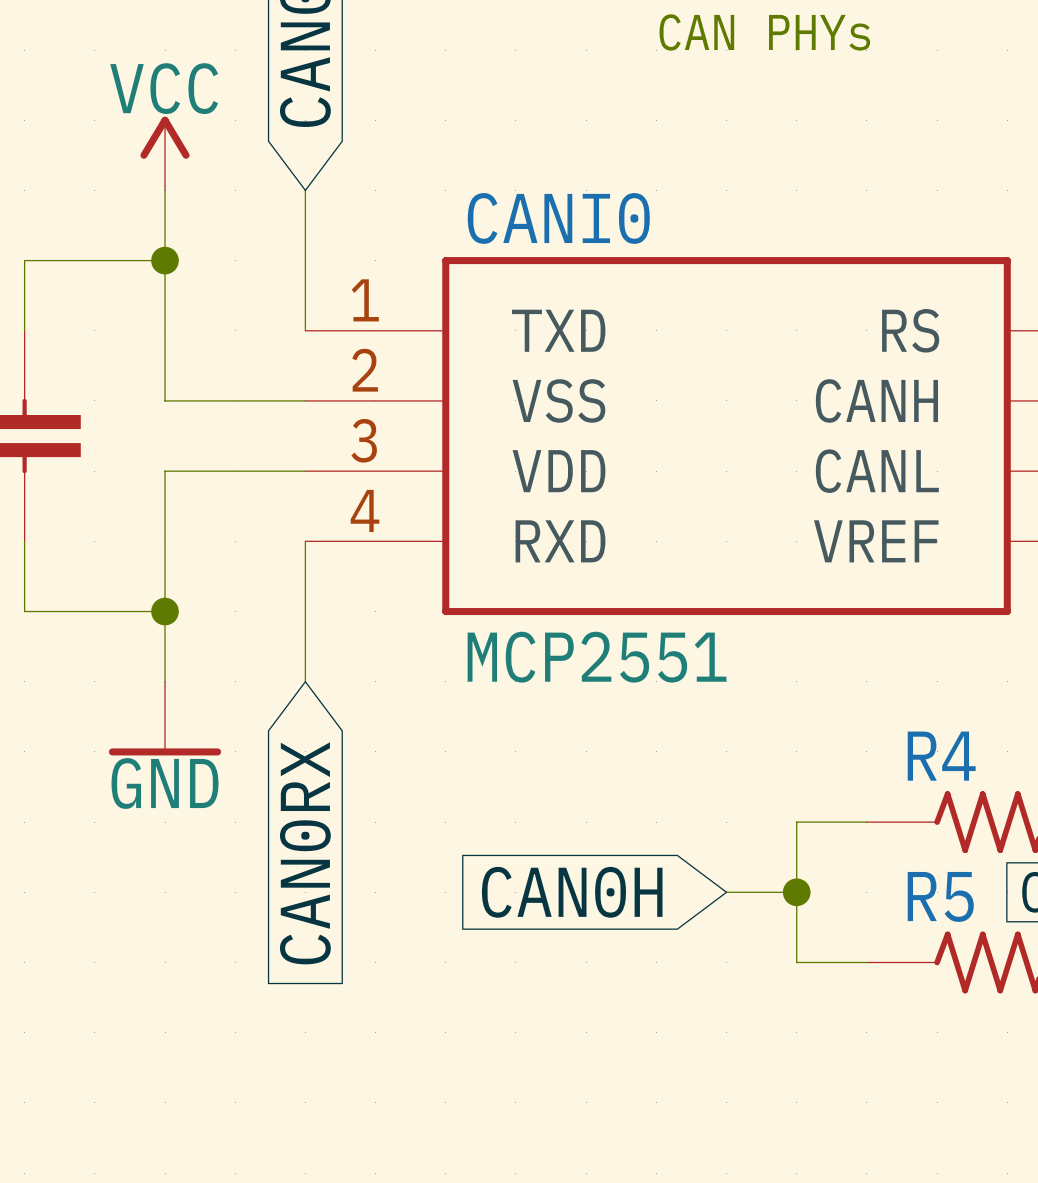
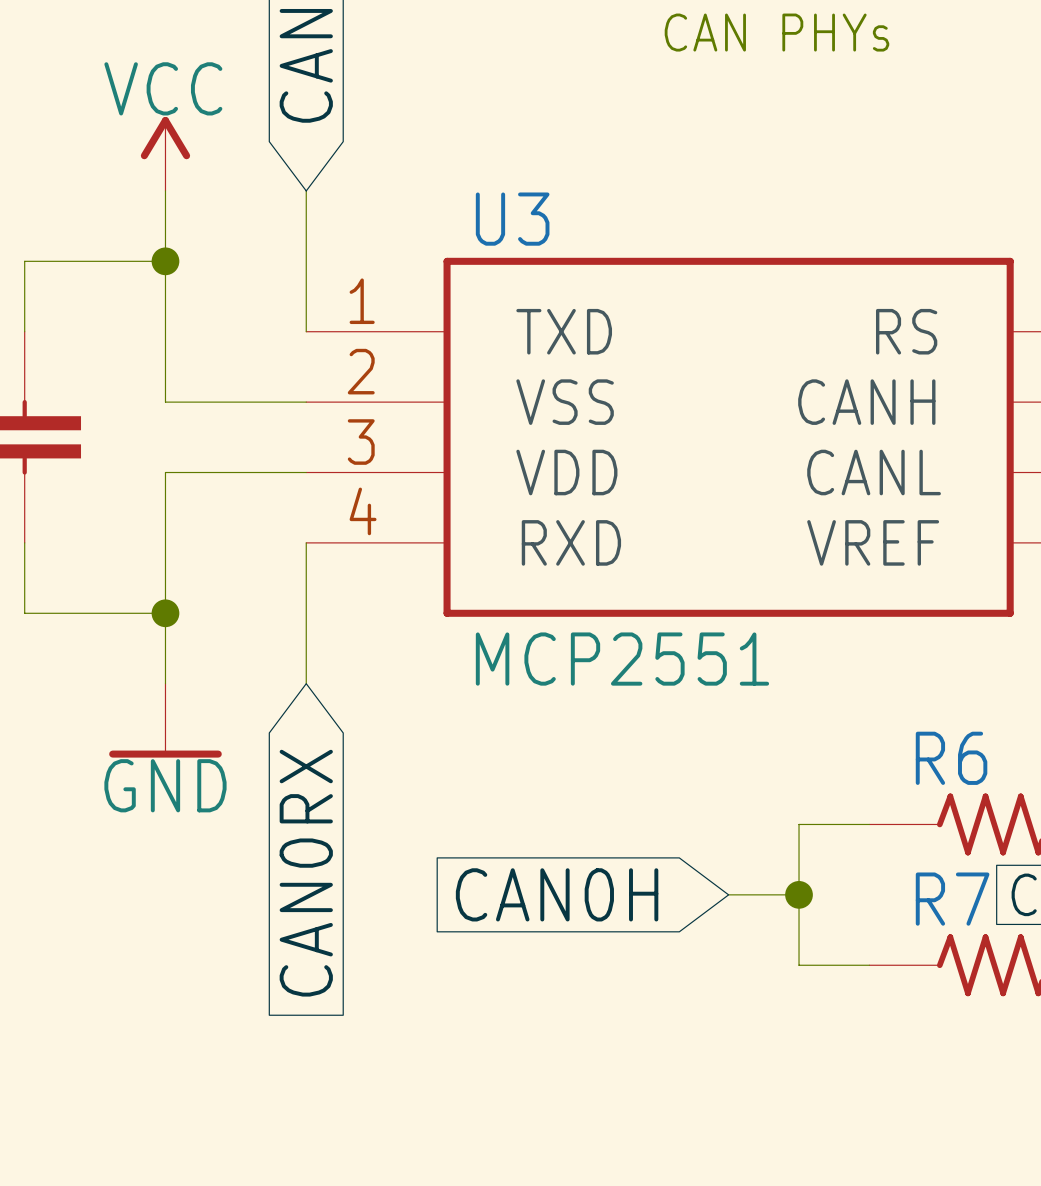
CANI0 name: CANI0 (558, 218) -> U3 (512, 219)
R4 name: R4 (941, 756) -> R6 (951, 758)
R5 name: R5 (940, 896) -> R7 (952, 899)

